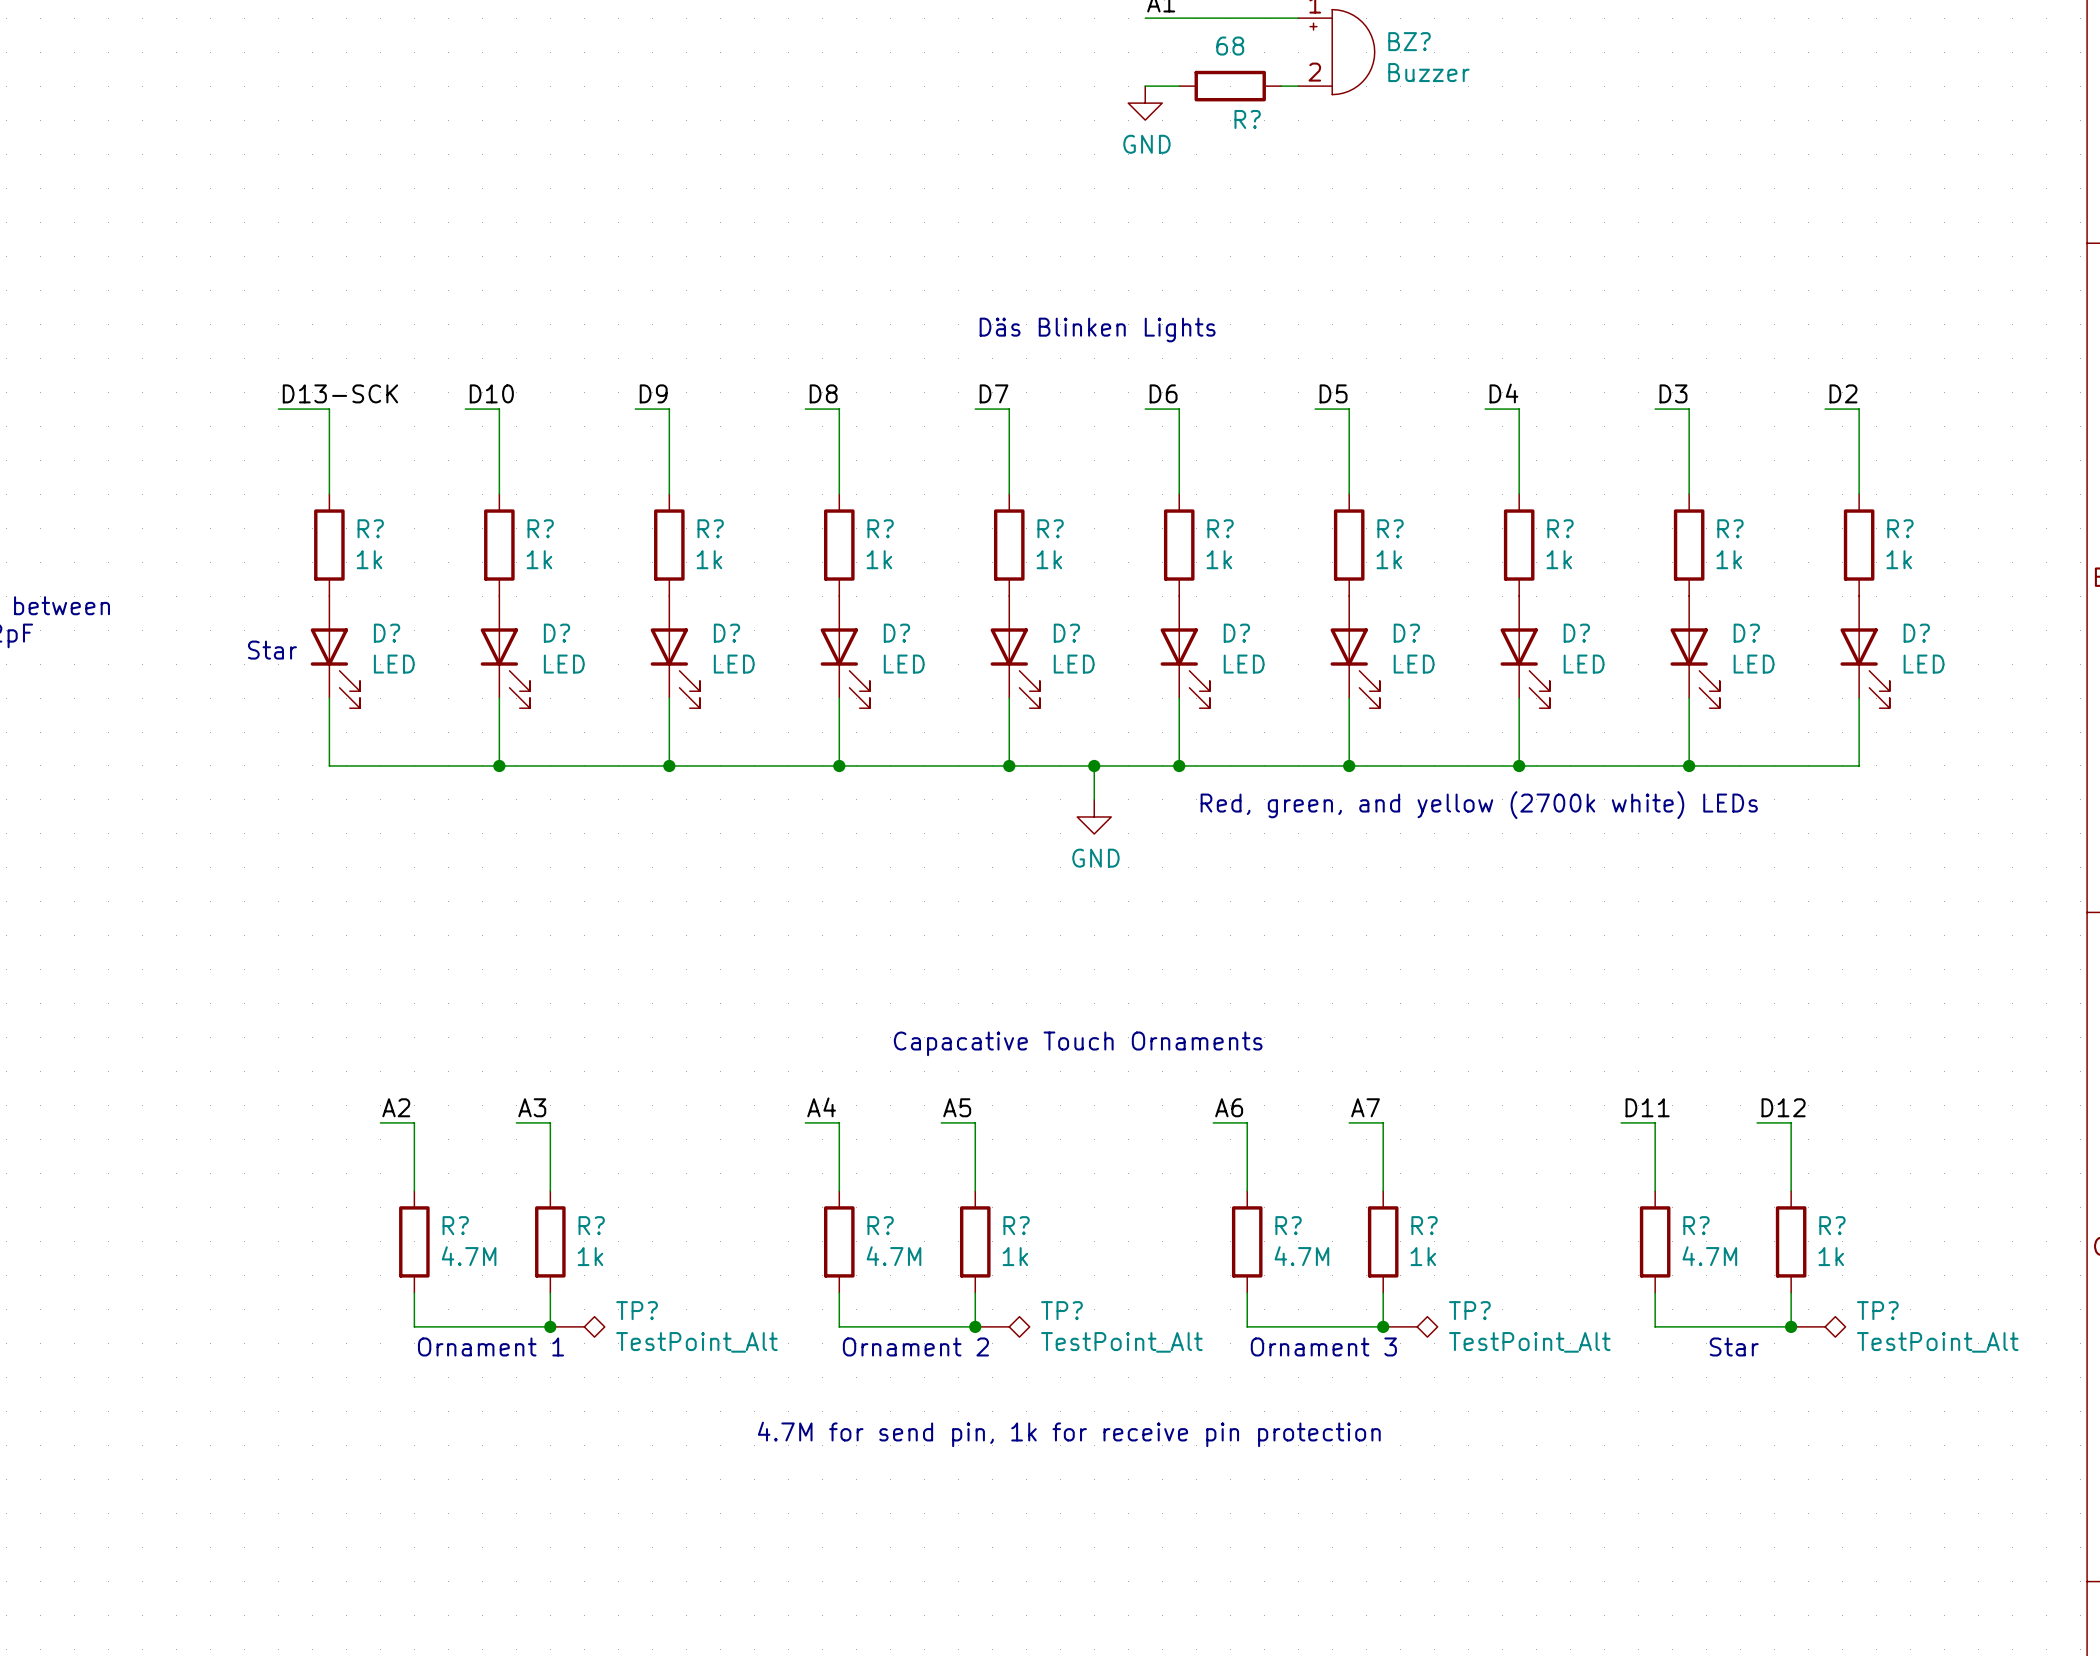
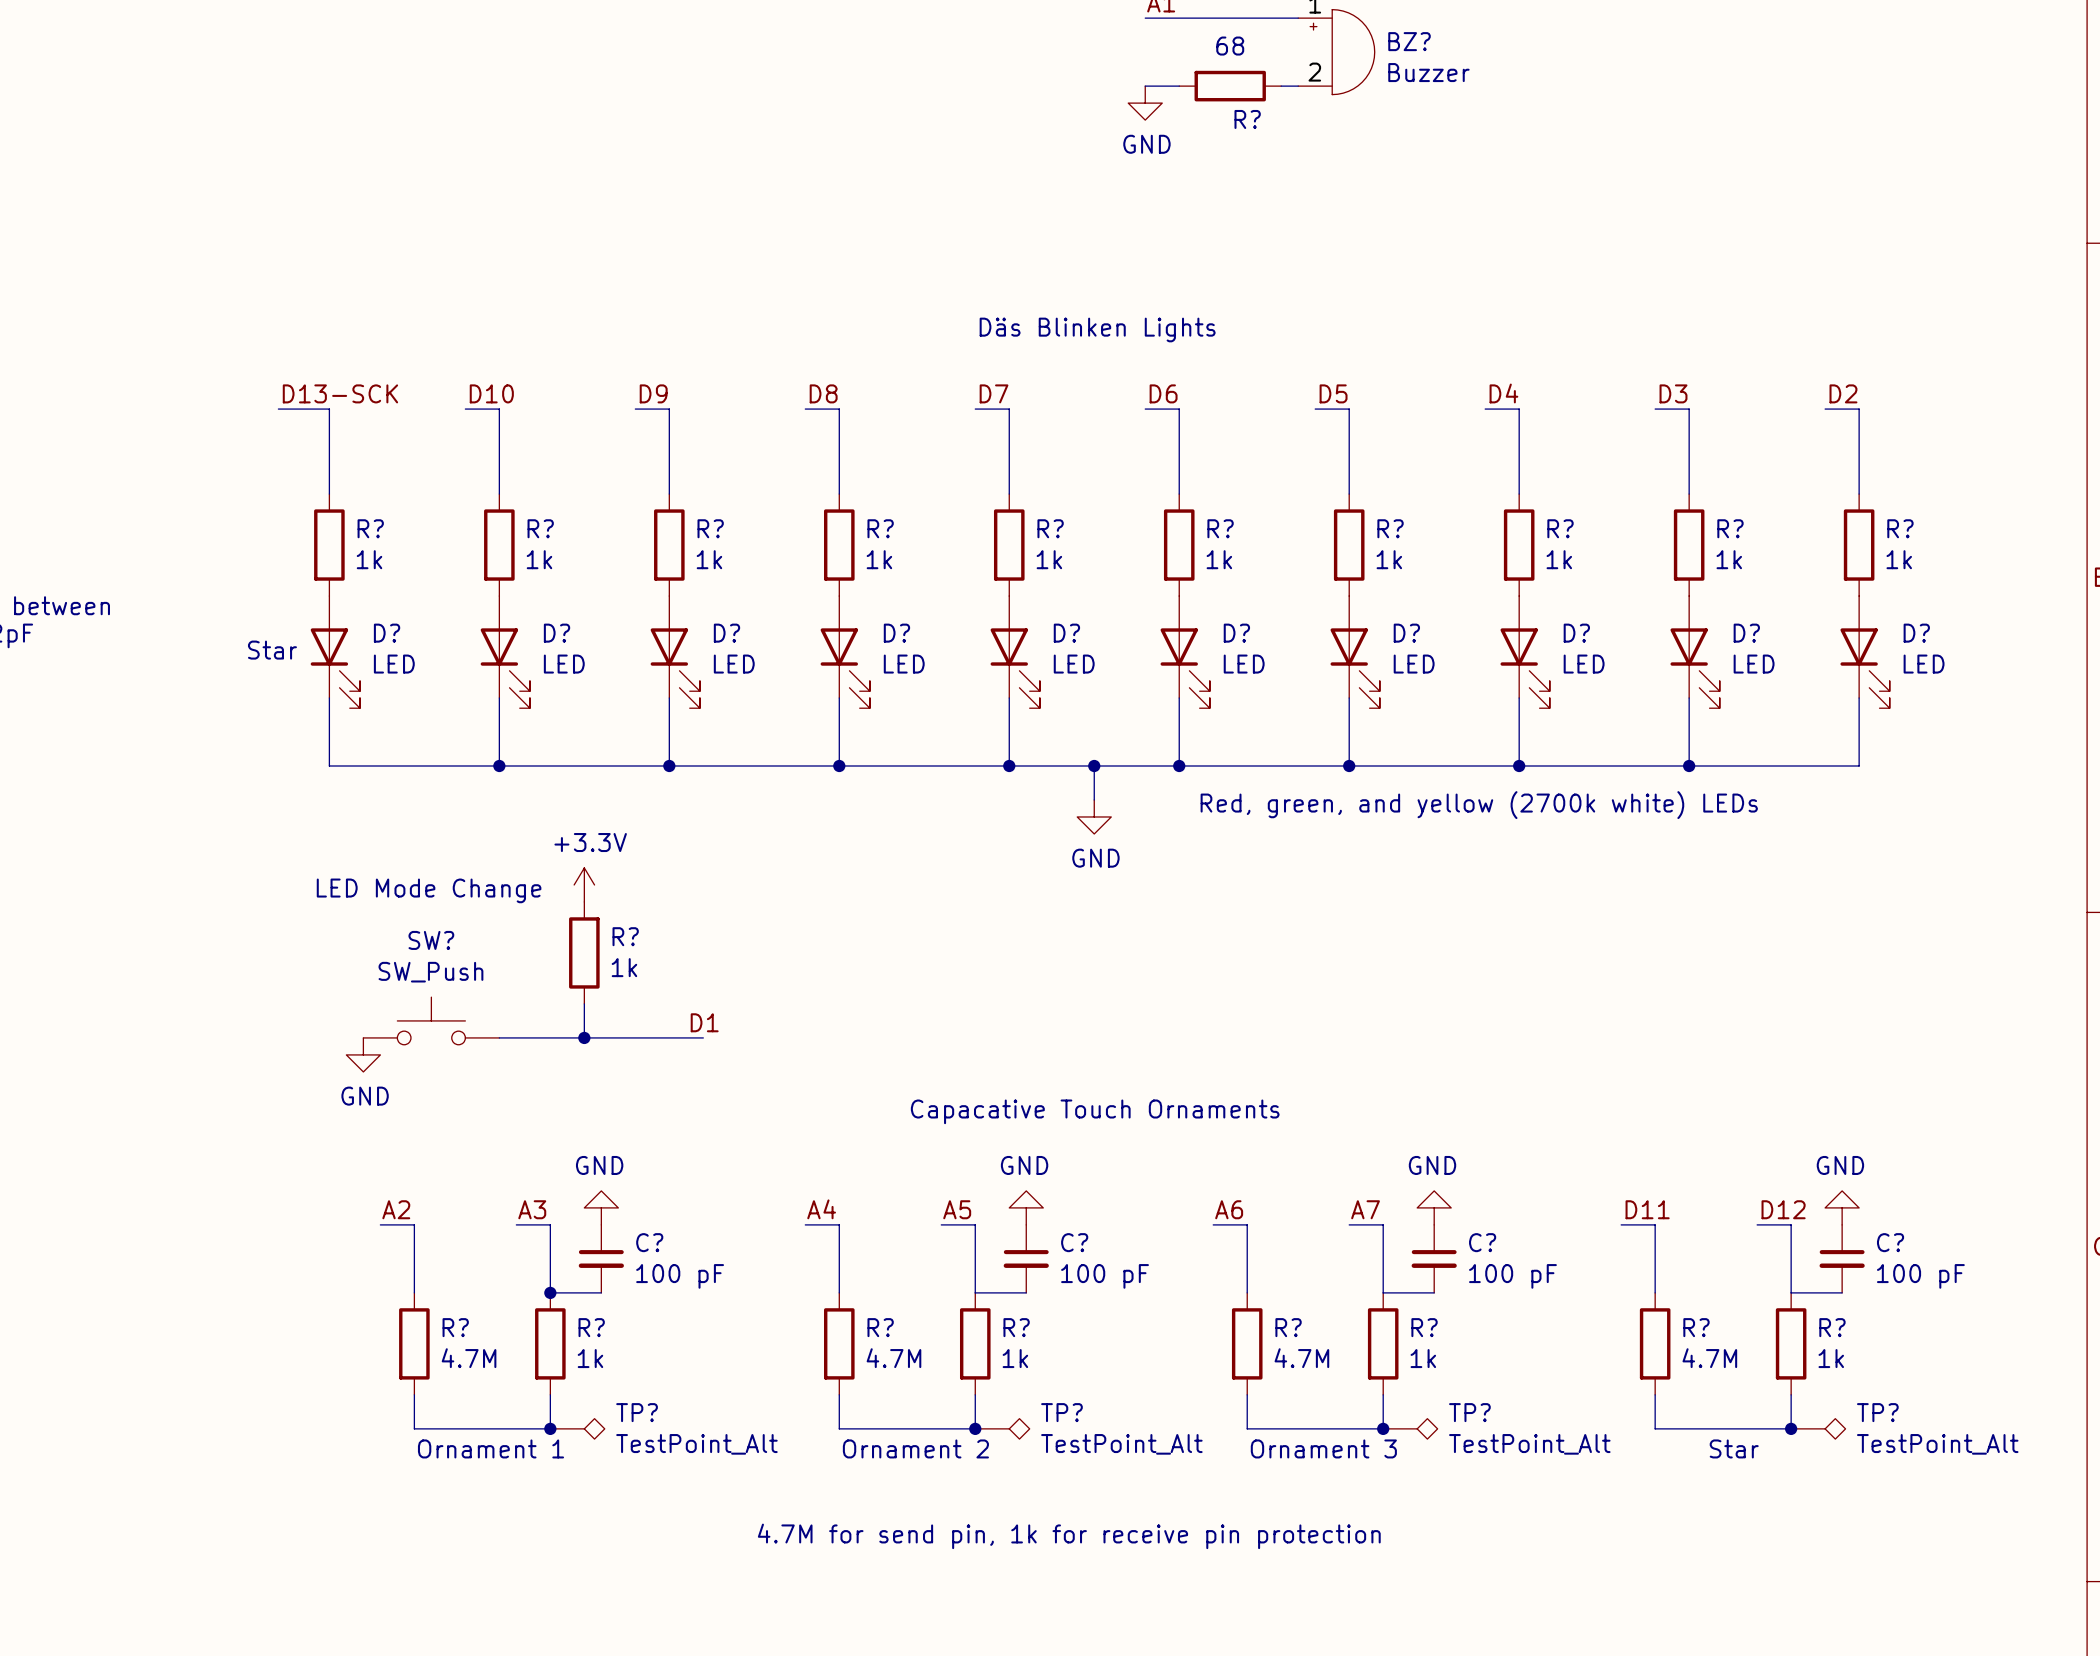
power symbol: none -> +3.3V (584, 884)
text: none -> LED Mode Change (429, 890)
R?: none -> 1k (584, 952)
wire: none -> (584, 1003) (584, 1037)
SW?: none -> SW_Push (431, 1020)
label: none -> D1 (704, 1022)
wire: none -> (499, 1037) (703, 1037)
junction: none -> (584, 1037)
text position: Capacative Touch Ornaments (1078, 1043) -> Capacative Touch Ornaments (1095, 1111)
power symbol: none -> GND (363, 1054)
label position: A2 (396, 1107) -> A2 (396, 1209)
label position: A3 (532, 1107) -> A3 (532, 1209)
label position: A4 (821, 1107) -> A4 (821, 1209)
label position: A5 (957, 1107) -> A5 (957, 1209)
label position: A6 (1229, 1107) -> A6 (1229, 1209)
label position: A7 (1365, 1107) -> A7 (1365, 1209)
label position: D11 (1647, 1107) -> D11 (1647, 1209)
label position: D12 (1783, 1107) -> D12 (1783, 1209)
wire: (380, 1122) (414, 1122) (414, 1190) -> none
wire: (516, 1122) (550, 1122) (550, 1190) -> none
wire: (805, 1122) (839, 1122) (839, 1190) -> none
wire: (941, 1122) (975, 1122) (975, 1190) -> none
wire: (1213, 1122) (1247, 1122) (1247, 1190) -> none
wire: (1349, 1122) (1383, 1122) (1383, 1190) -> none
wire: (1621, 1122) (1655, 1122) (1655, 1190) -> none
wire: (1757, 1122) (1791, 1122) (1791, 1190) -> none
power symbol: none -> GND (601, 1207)
power symbol: none -> GND (1026, 1207)
power symbol: none -> GND (1434, 1207)
power symbol: none -> GND (1842, 1207)
wire: none -> (516, 1224) (550, 1224) (550, 1292) (601, 1292)
wire: none -> (941, 1224) (975, 1224) (975, 1292) (1026, 1292)
wire: none -> (1349, 1224) (1383, 1224) (1383, 1292) (1434, 1292)
wire: none -> (1757, 1224) (1791, 1224) (1791, 1292) (1842, 1292)
R? position: (414, 1241) -> (414, 1343)
R? position: (550, 1241) -> (550, 1343)
R? position: (839, 1241) -> (839, 1343)
R? position: (975, 1241) -> (975, 1343)
R? position: (1247, 1241) -> (1247, 1343)
R? position: (1383, 1241) -> (1383, 1343)
R? position: (1655, 1241) -> (1655, 1343)
R? position: (1791, 1241) -> (1791, 1343)
C?: none -> 100 pF (601, 1258)
C?: none -> 100 pF (1026, 1258)
C?: none -> 100 pF (1434, 1258)
C?: none -> 100 pF (1842, 1258)
wire: (414, 1292) (414, 1326) (550, 1326) (550, 1292) -> (414, 1292) (414, 1224) (380, 1224)
wire: (839, 1292) (839, 1326) (975, 1326) (975, 1292) -> (839, 1292) (839, 1224) (805, 1224)
wire: (1247, 1292) (1247, 1326) (1383, 1326) (1383, 1292) -> (1247, 1292) (1247, 1224) (1213, 1224)
wire: (1655, 1292) (1655, 1326) (1791, 1326) (1791, 1292) -> (1655, 1292) (1655, 1224) (1621, 1224)
junction position: (550, 1326) -> (550, 1292)
TP? position: (577, 1326) -> (577, 1428)
junction: (975, 1326) -> none
TP? position: (1002, 1326) -> (1002, 1428)
junction: (1383, 1326) -> none
TP? position: (1410, 1326) -> (1410, 1428)
junction: (1791, 1326) -> none
TP? position: (1818, 1326) -> (1818, 1428)
text position: Ornament 1 (490, 1346) -> Ornament 1 (490, 1448)
text position: Ornament 2 (915, 1346) -> Ornament 2 (915, 1448)
text position: Ornament 3 (1323, 1346) -> Ornament 3 (1323, 1448)
text position: Star (1734, 1346) -> Star (1734, 1448)
wire: none -> (414, 1394) (414, 1428) (550, 1428) (550, 1394)
wire: none -> (839, 1394) (839, 1428) (975, 1428) (975, 1394)
wire: none -> (1247, 1394) (1247, 1428) (1383, 1428) (1383, 1394)
wire: none -> (1655, 1394) (1655, 1428) (1791, 1428) (1791, 1394)
junction: none -> (550, 1428)
junction: none -> (975, 1428)
junction: none -> (1383, 1428)
junction: none -> (1791, 1428)
text position: 4.7M for send pin, 1k for receive pin protection (1069, 1434) -> 4.7M for send pin, 1k for receive pin protection (1069, 1536)

